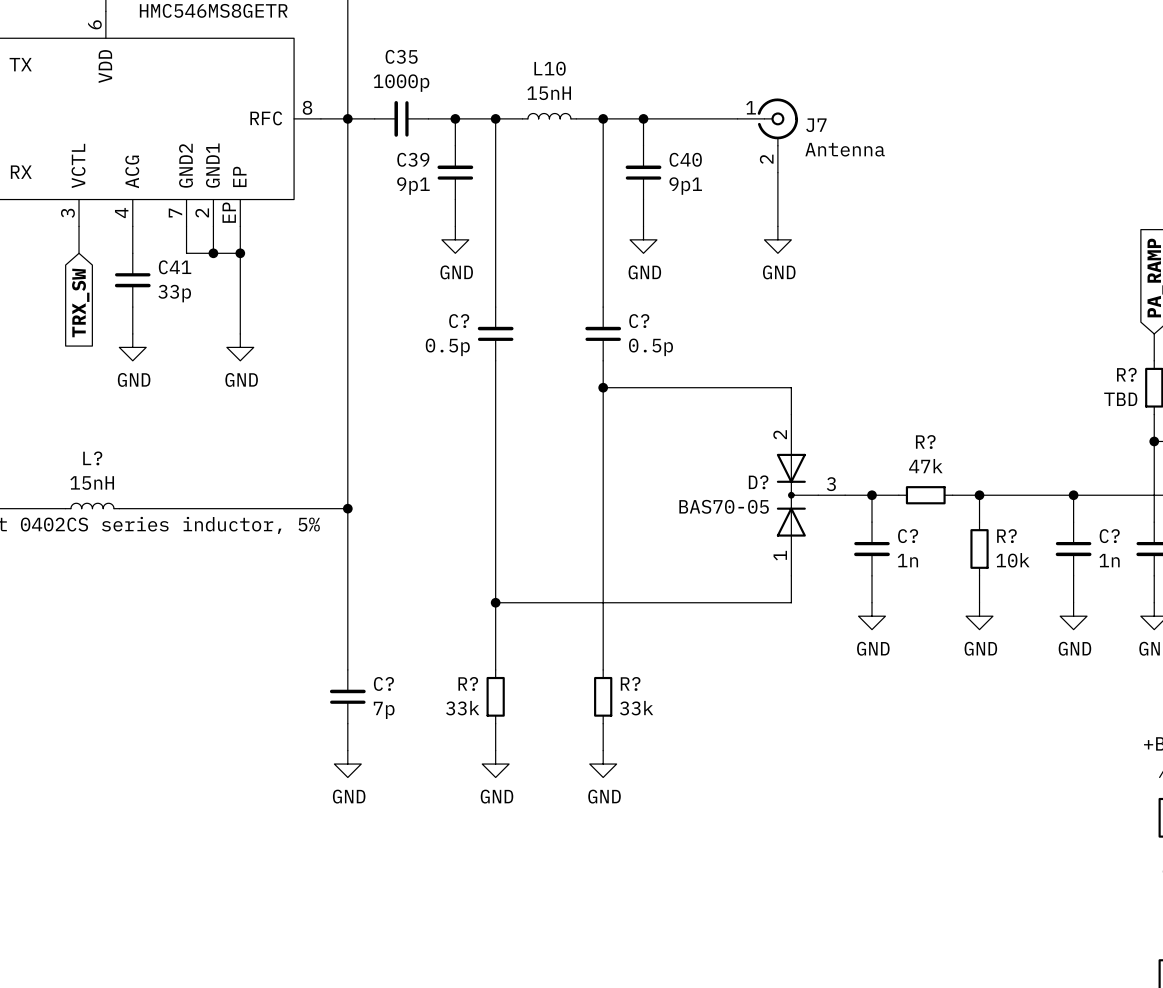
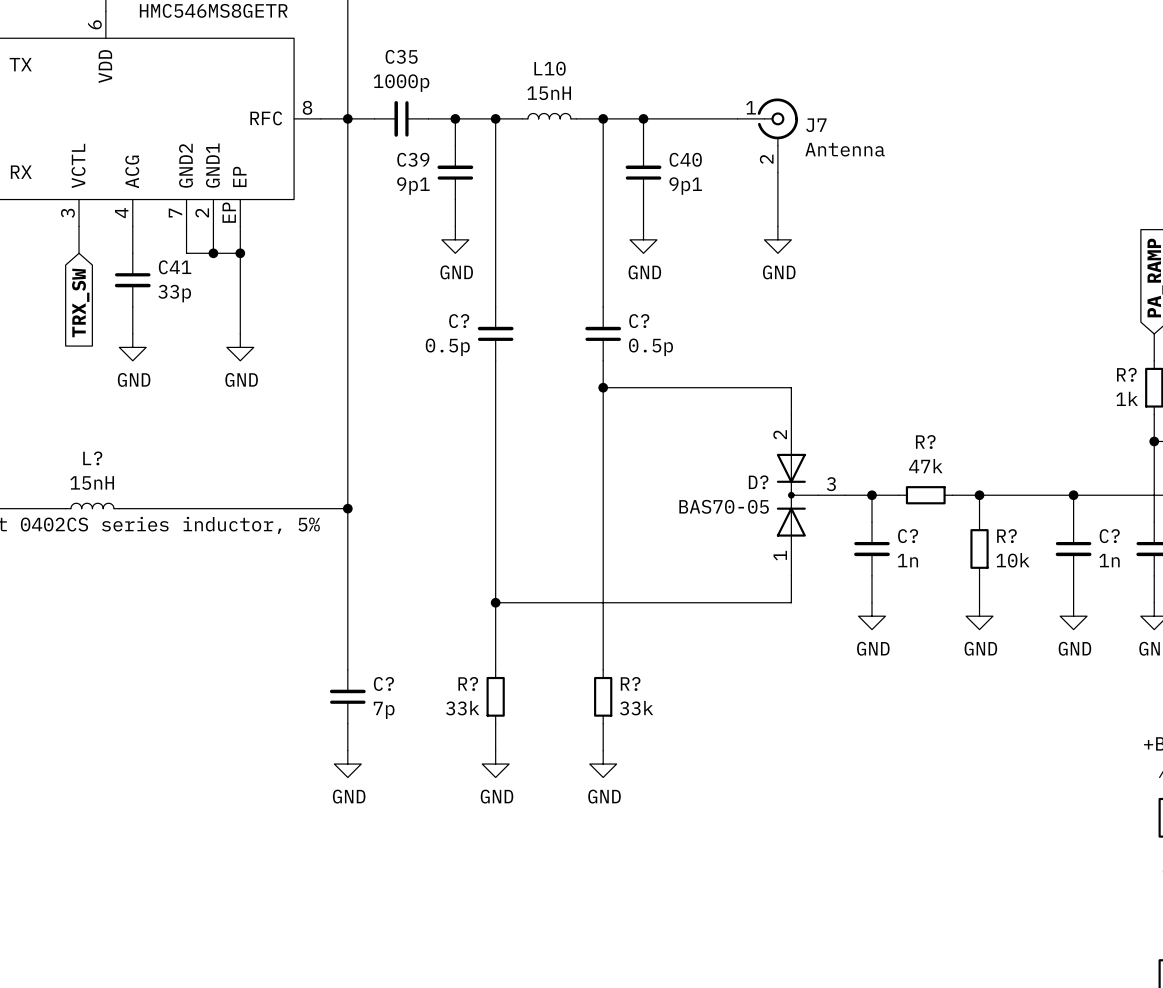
R? value: TBD (1120, 399) -> 1k (1127, 398)

